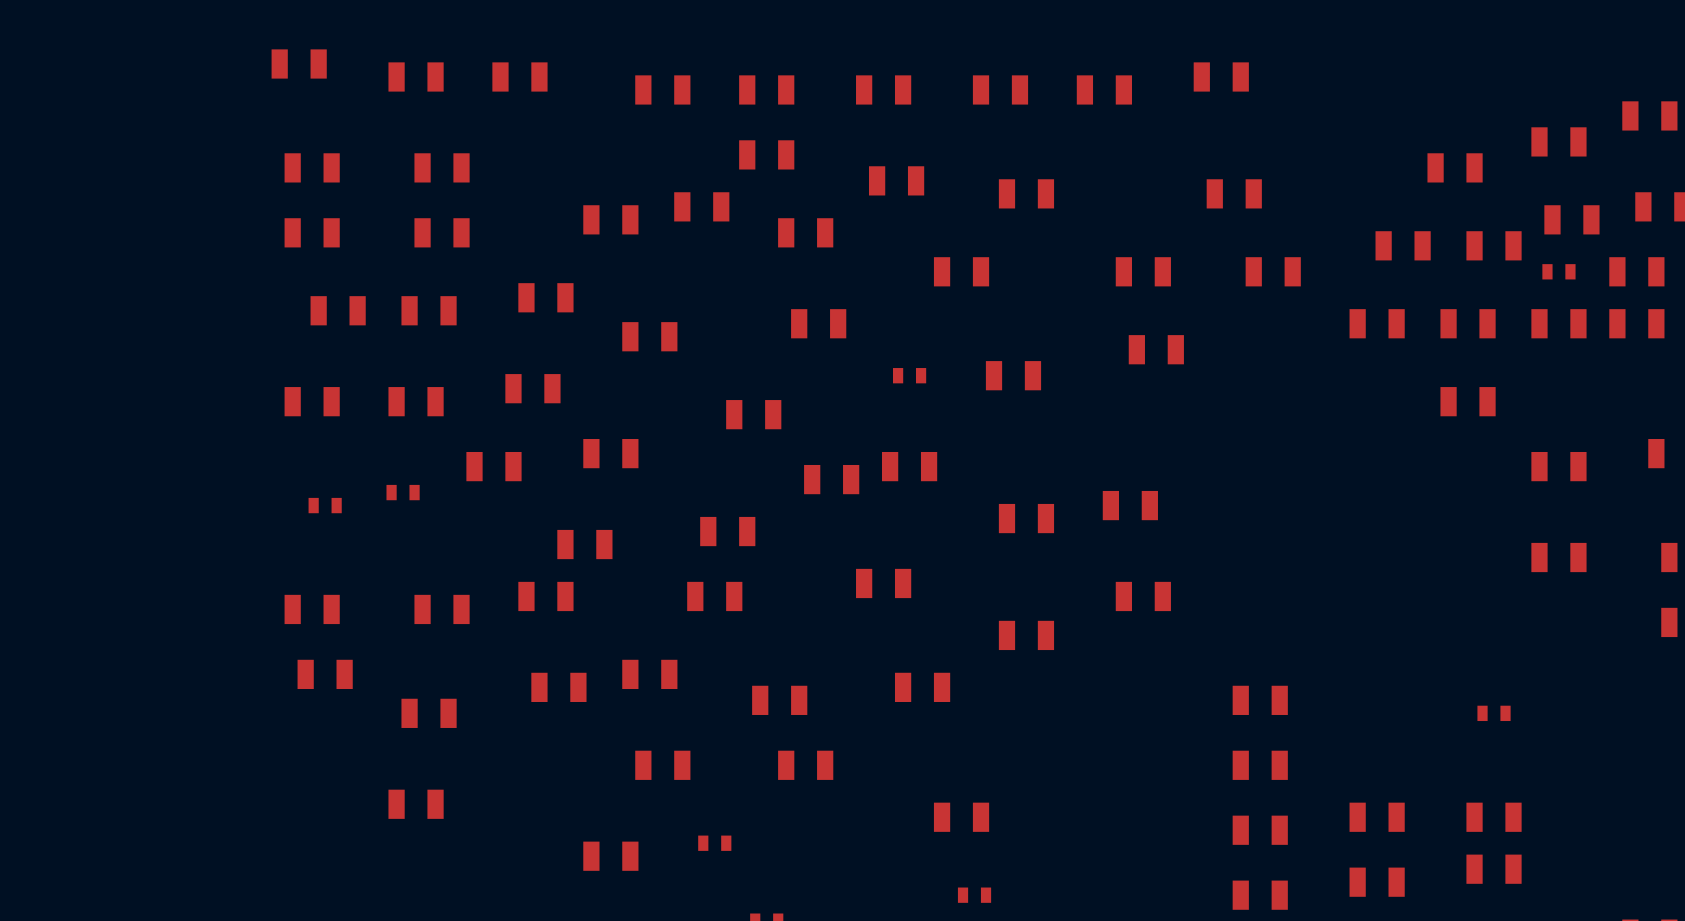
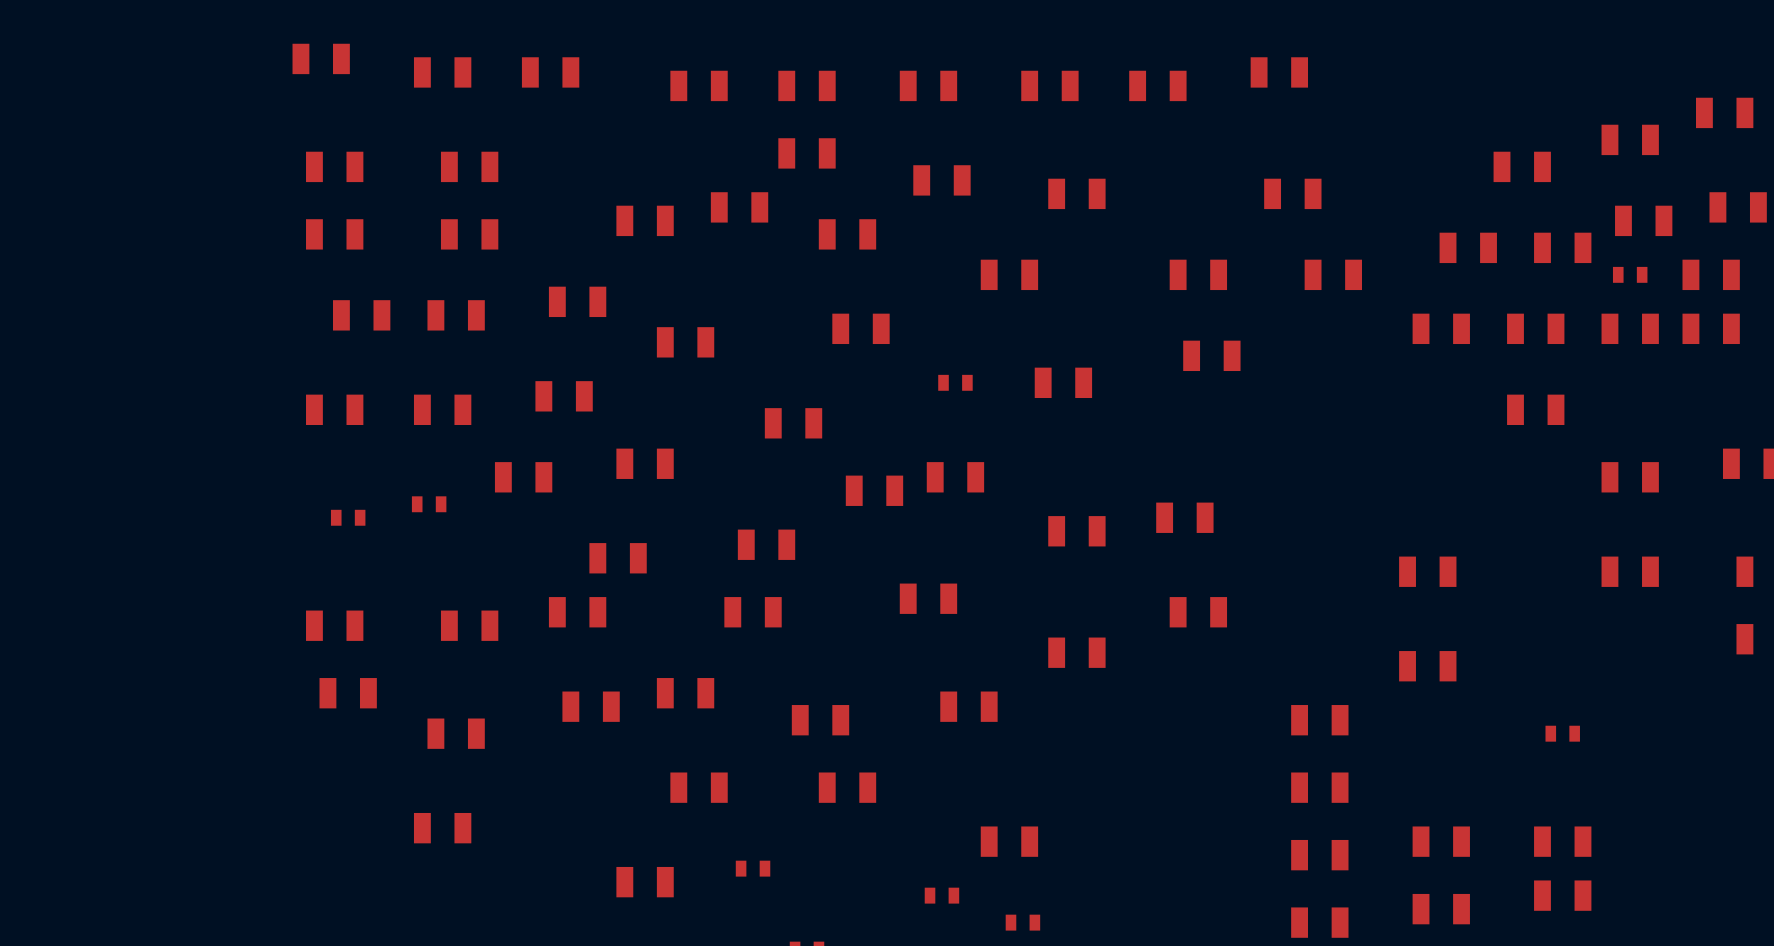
part: none -> (1427, 571)
part: none -> (1427, 666)
part: none -> (941, 895)

